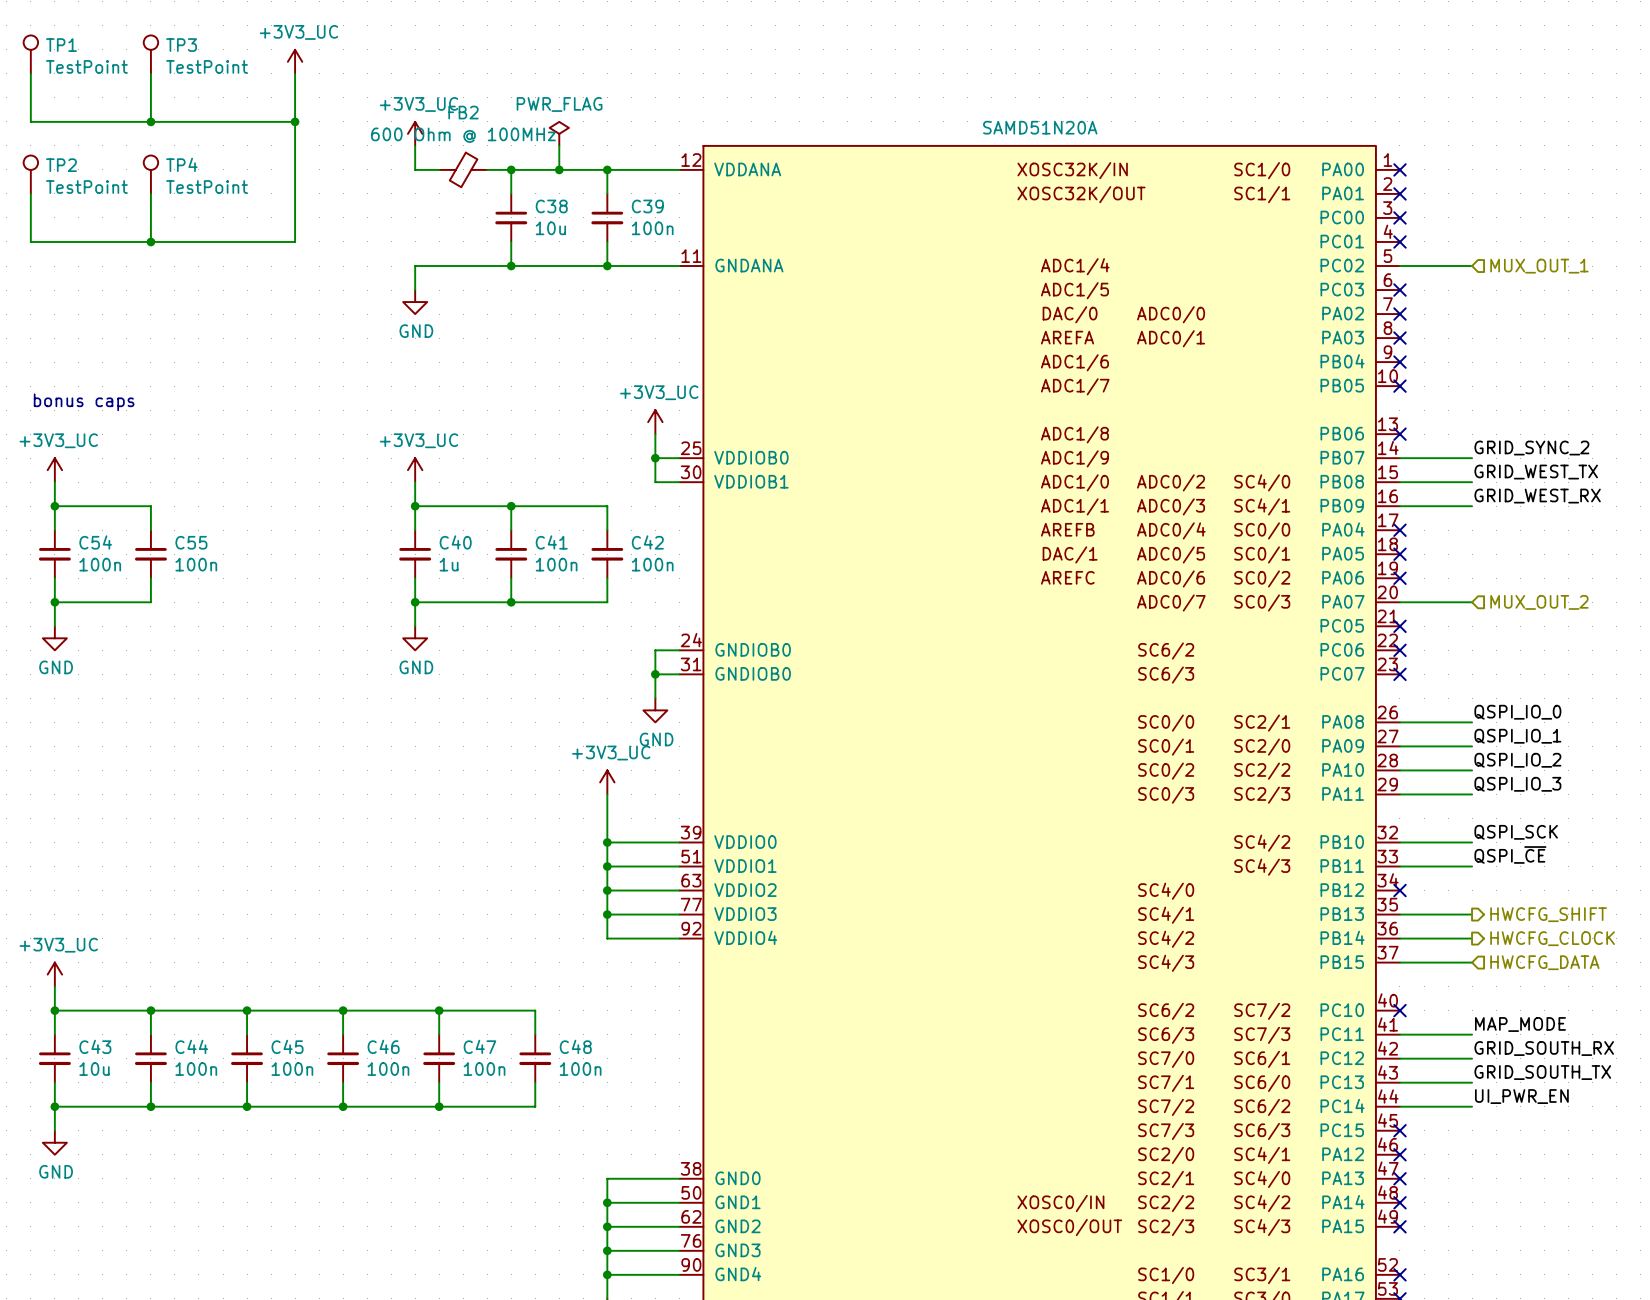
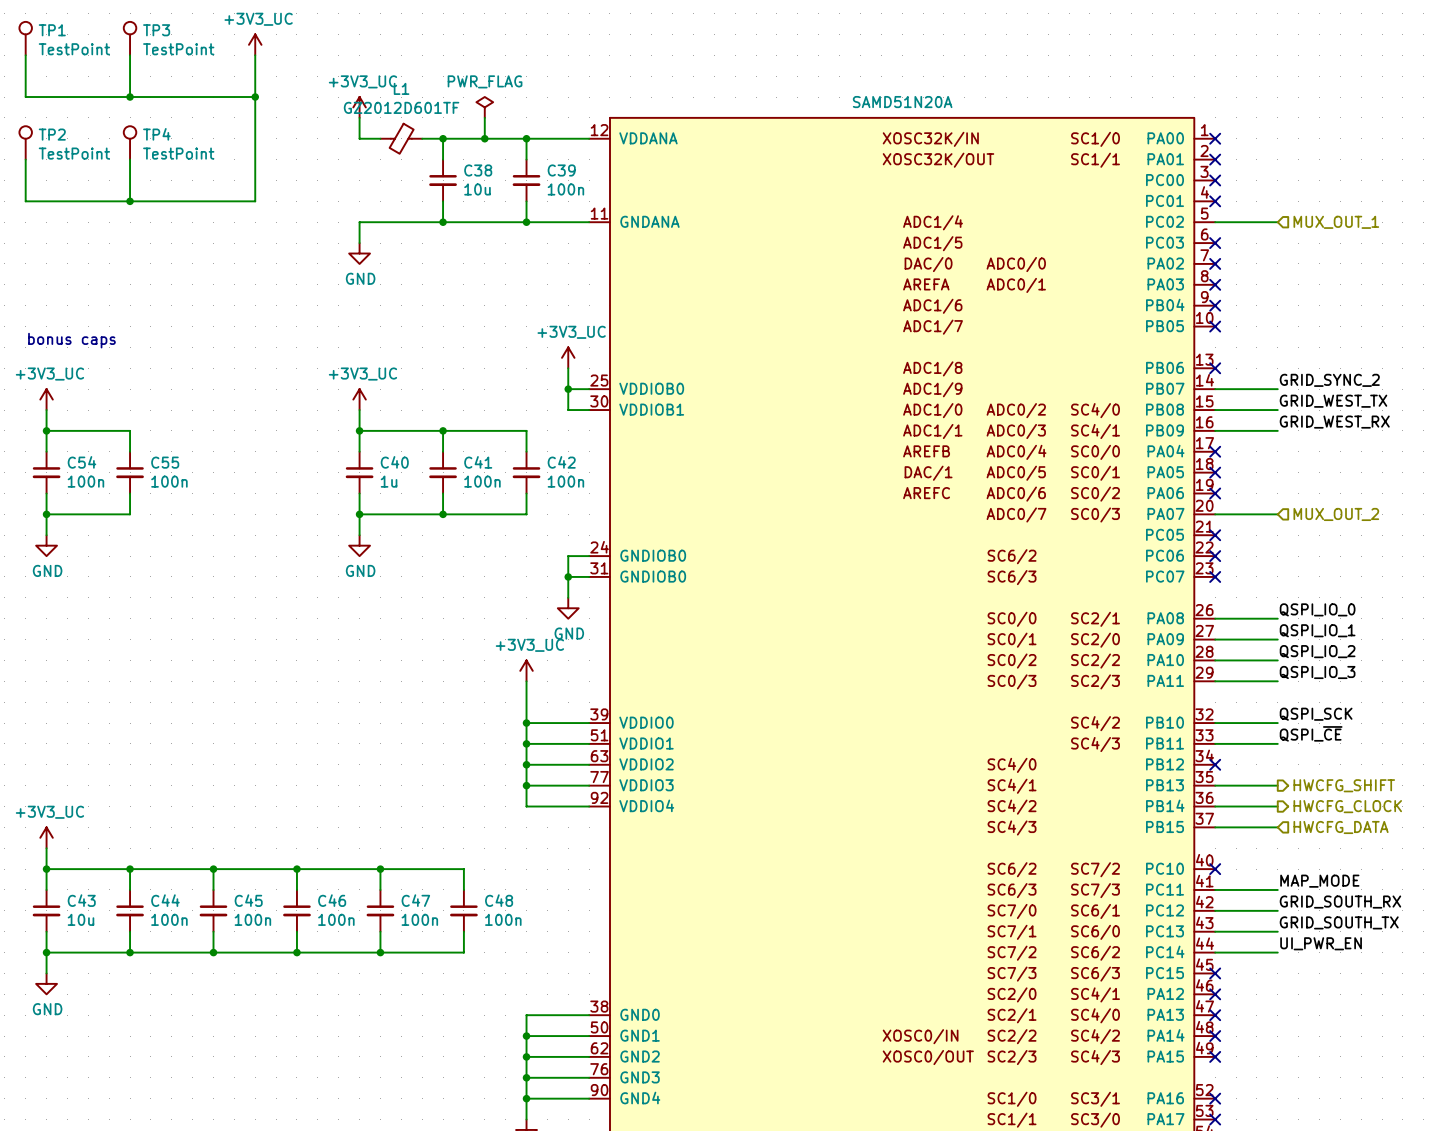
FB2 name: FB2 (463, 112) -> L1 (401, 88)
FB2 value: 600 Ohm @ 100MHz (463, 135) -> GZ2012D601TF (401, 107)

